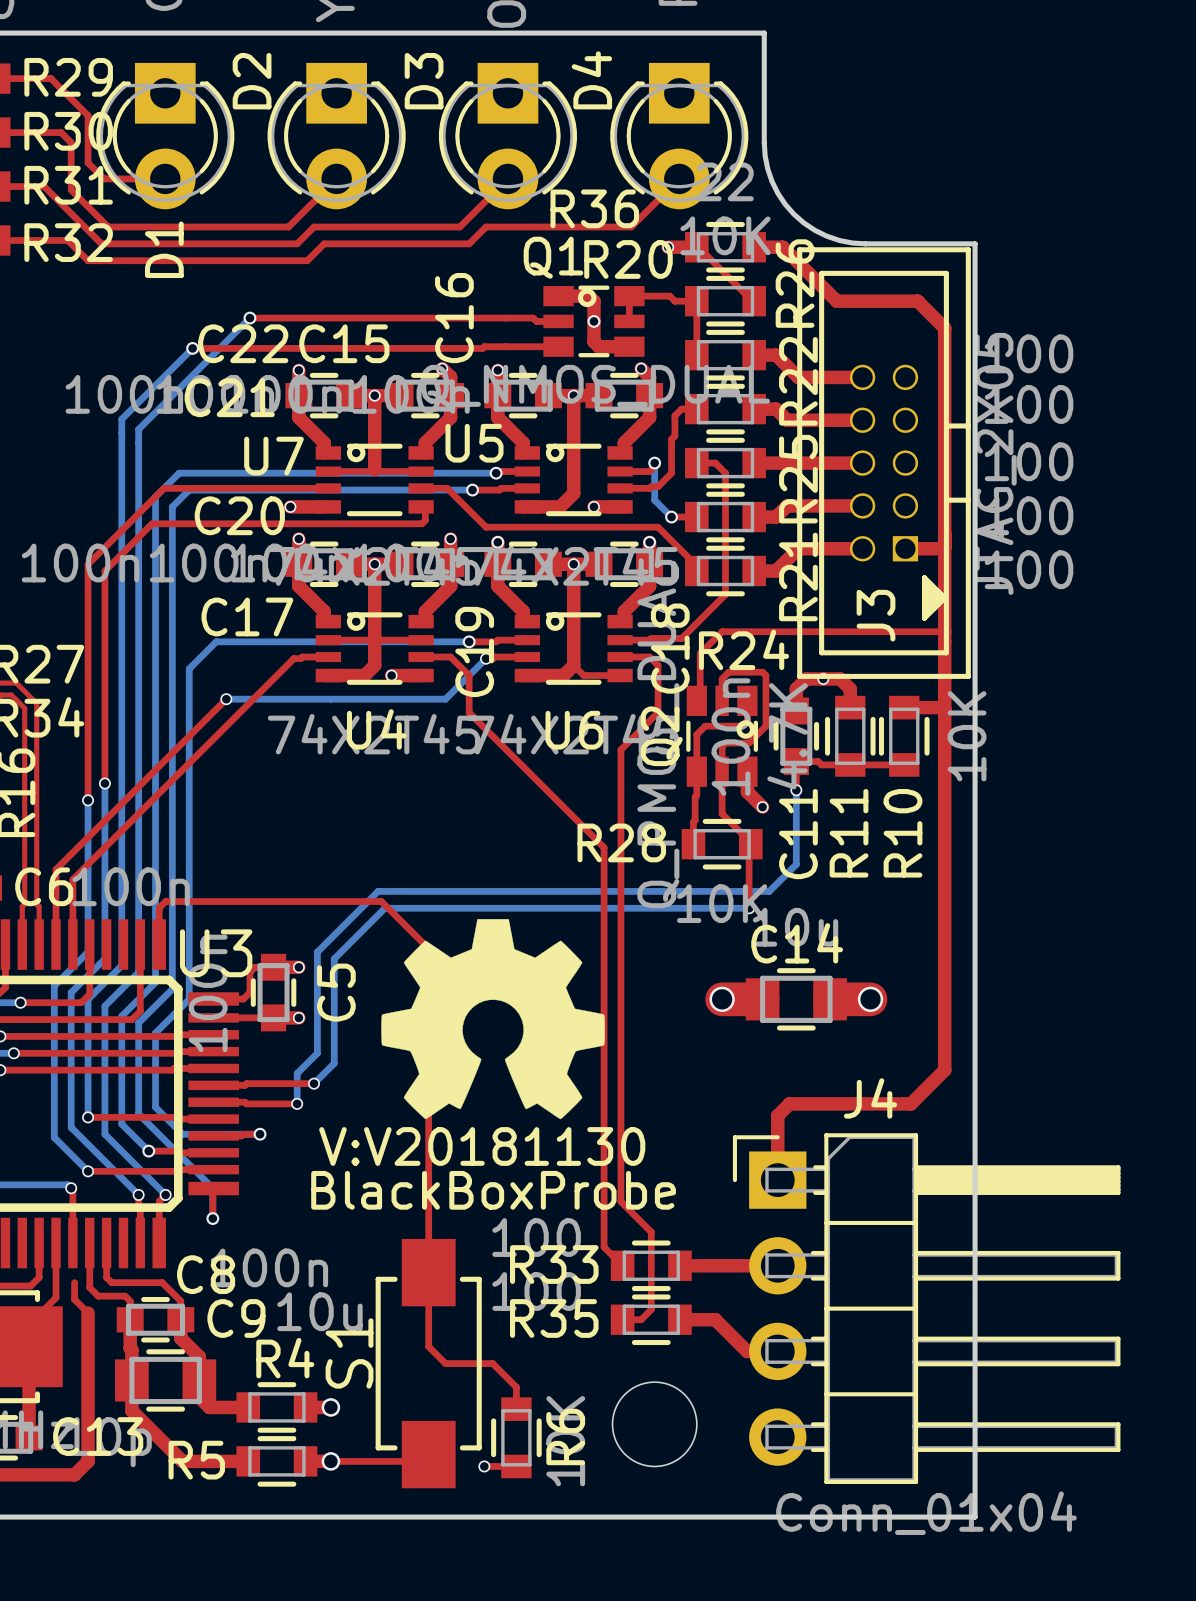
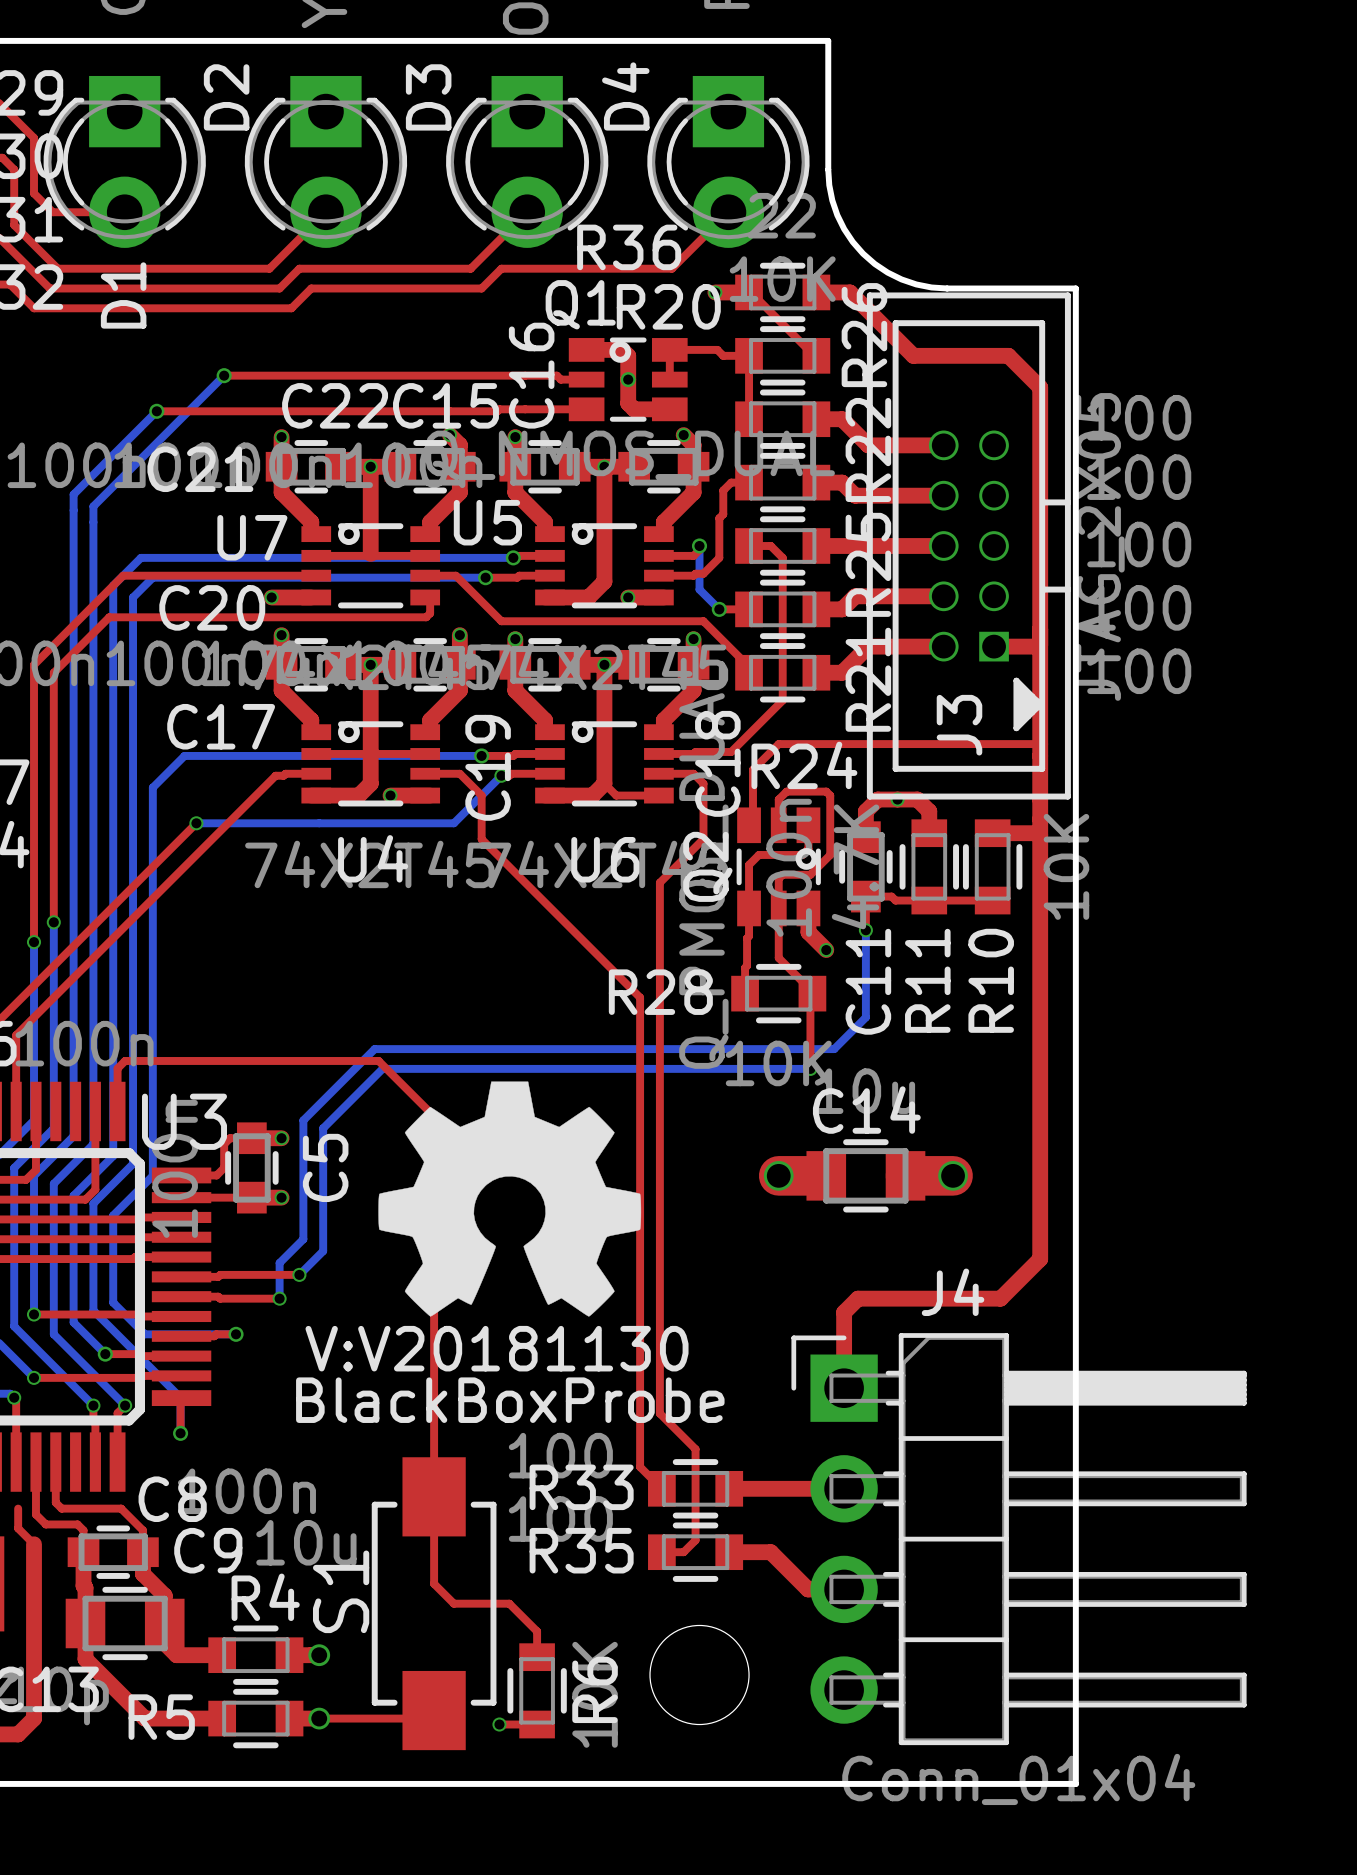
C16 name position: C16 (454, 318) -> C16 (531, 375)
C22 name position: C22 (243, 343) -> C22 (335, 405)
C15 name position: C15 (344, 343) -> C15 (445, 405)

